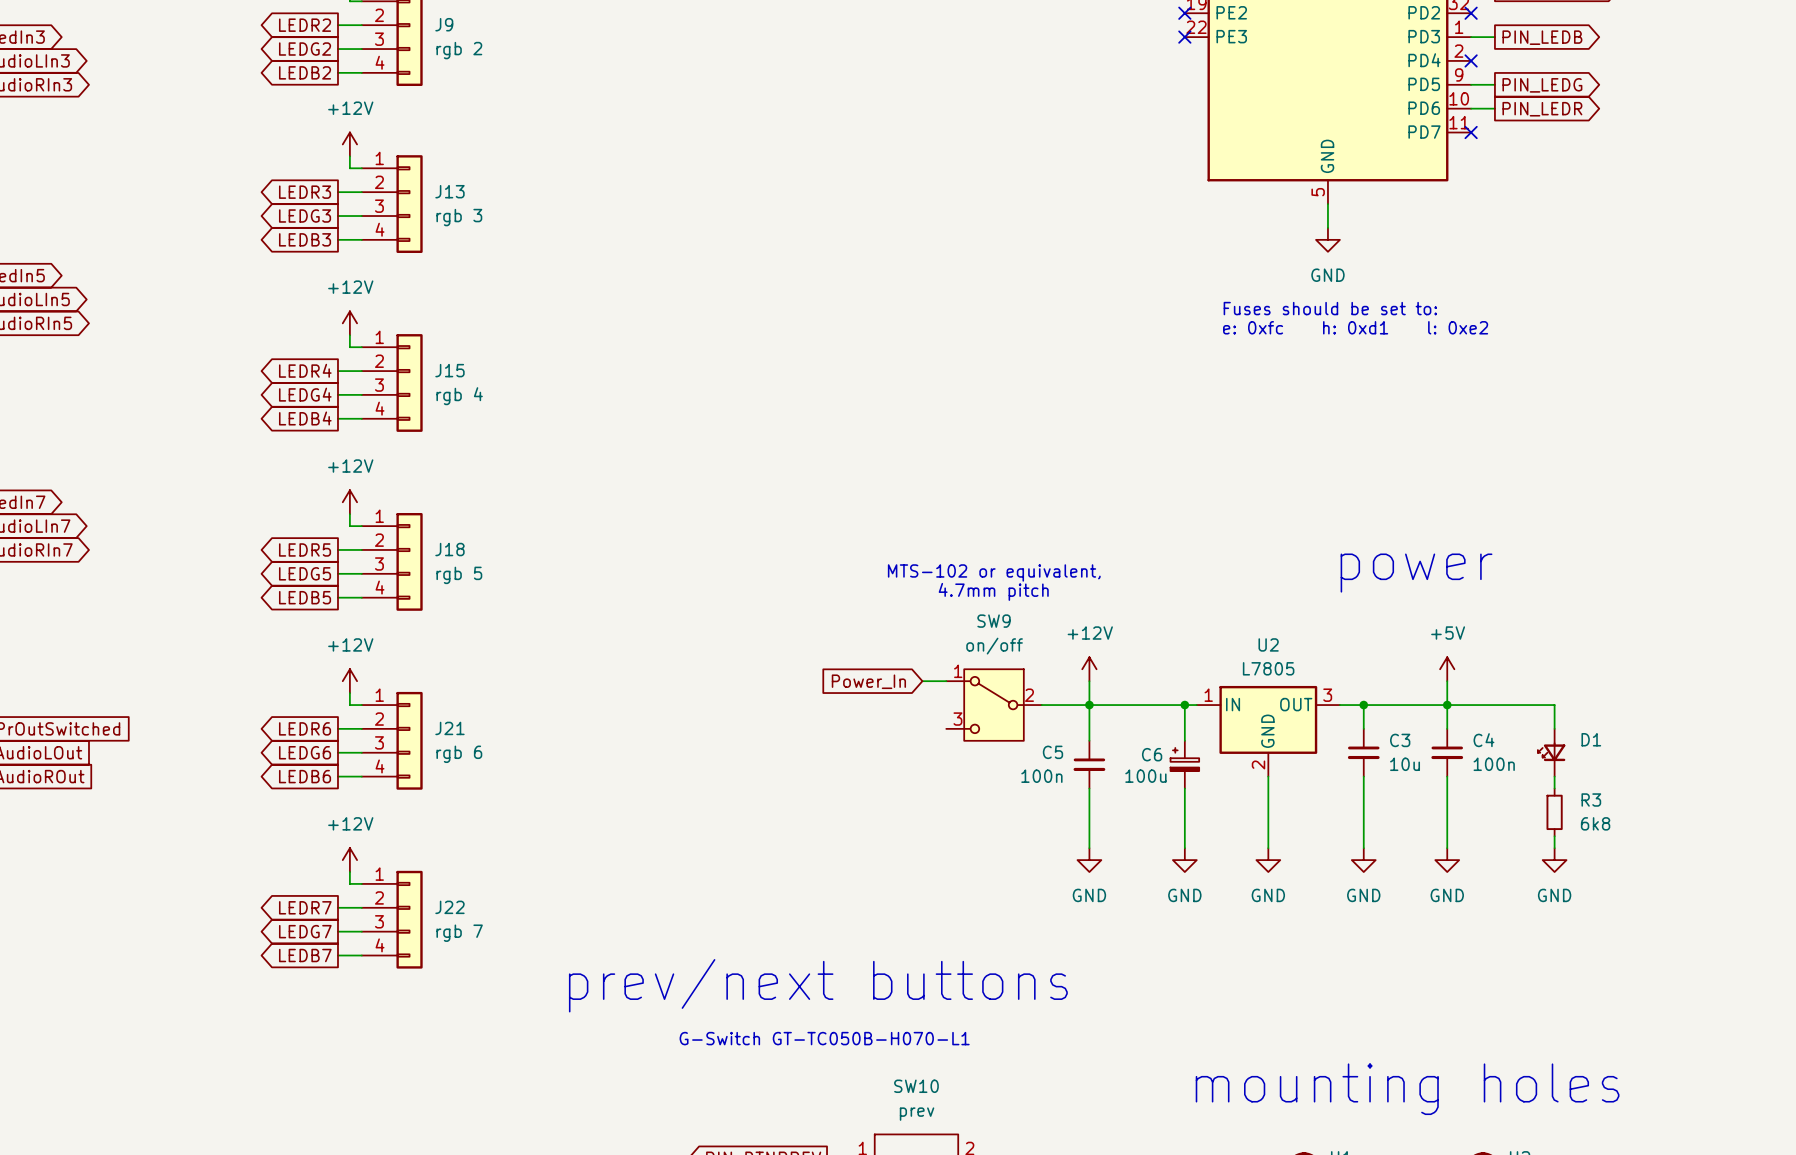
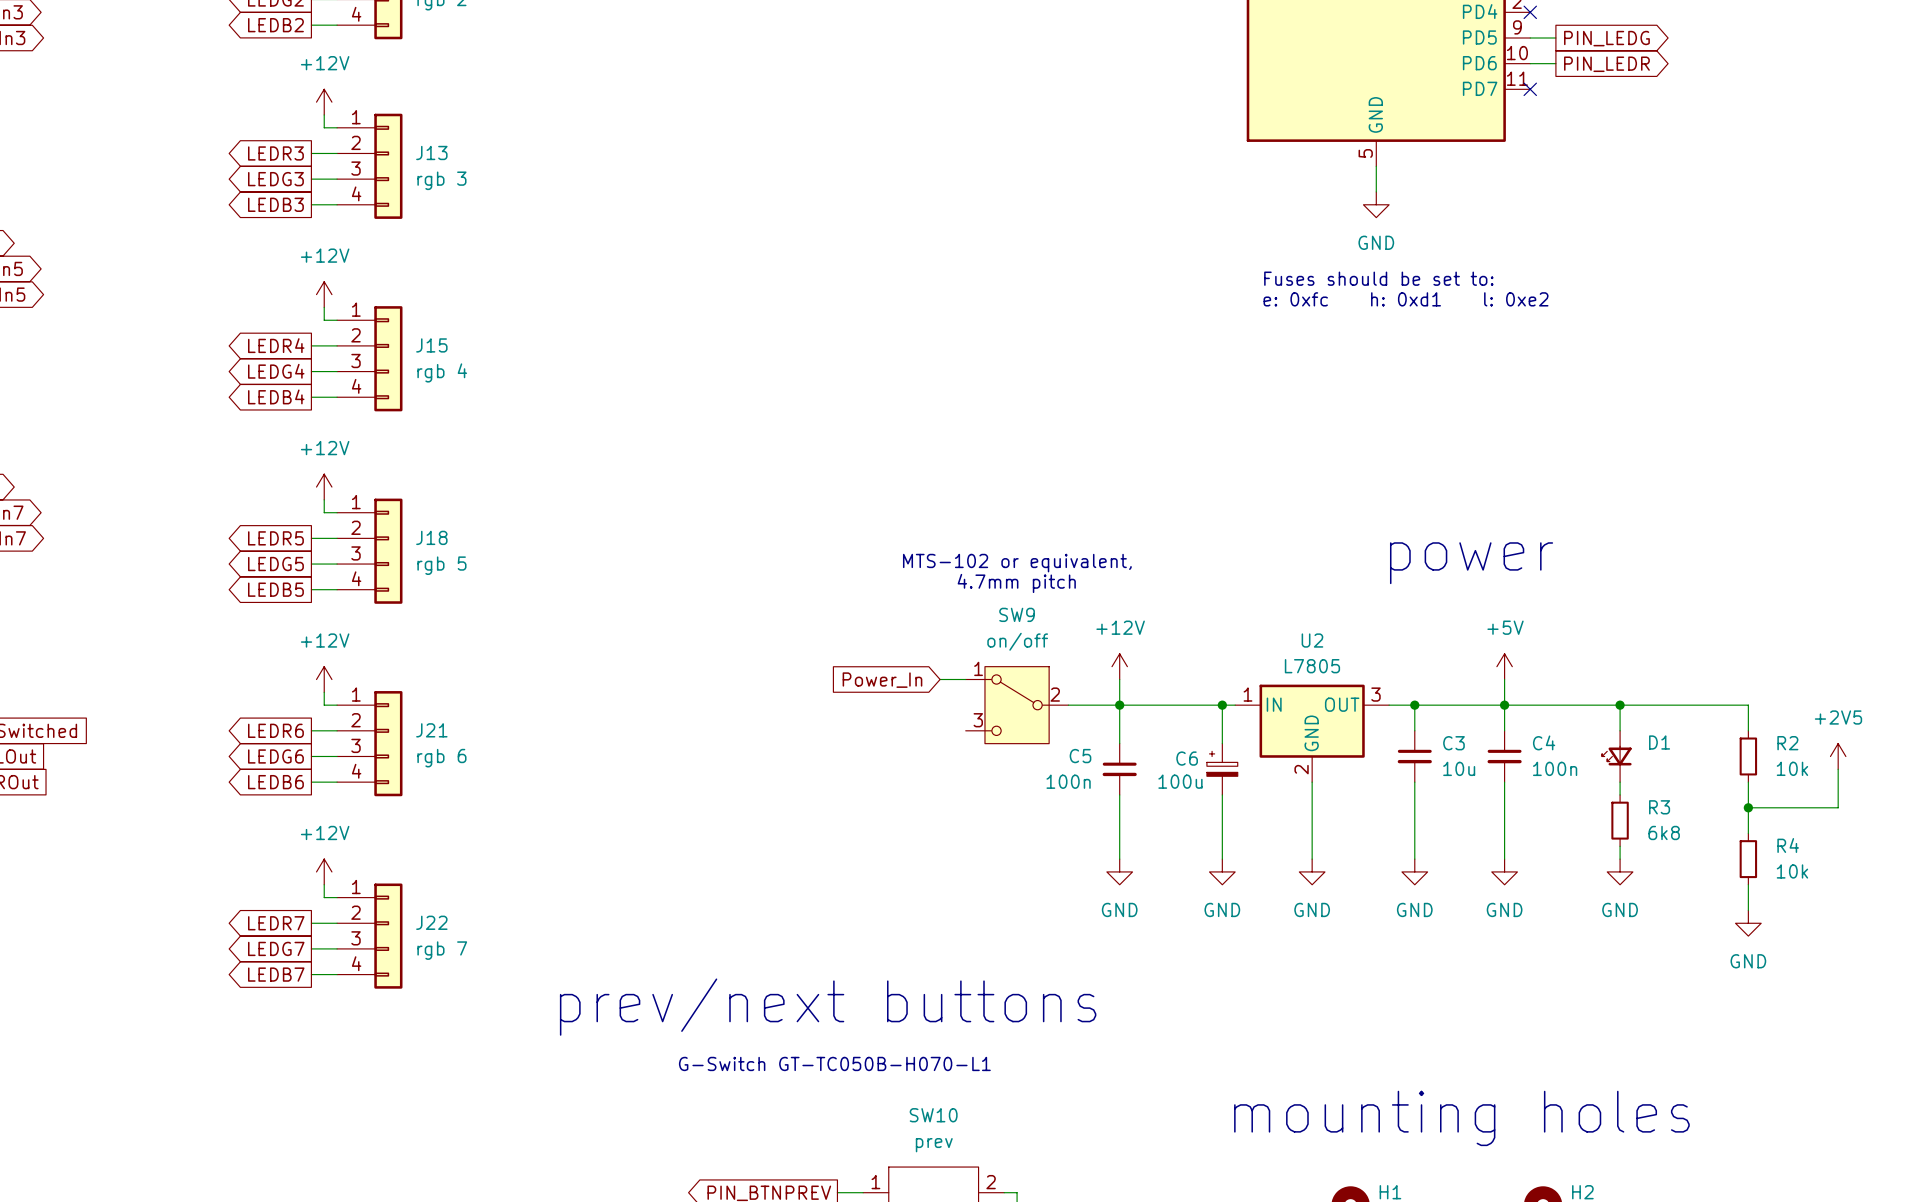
wire: none -> (1620, 705) (1748, 705) (1748, 730)
junction: none -> (1620, 705)
R2: none -> 10k (1748, 756)
power symbol: none -> +2V5 (1838, 756)
wire: none -> (1838, 769) (1838, 807) (1748, 807)
wire: none -> (1748, 782) (1748, 833)
junction: none -> (1748, 807)
R4: none -> 10k (1748, 859)
wire: none -> (1748, 884) (1748, 910)
power symbol: none -> GND (1748, 923)

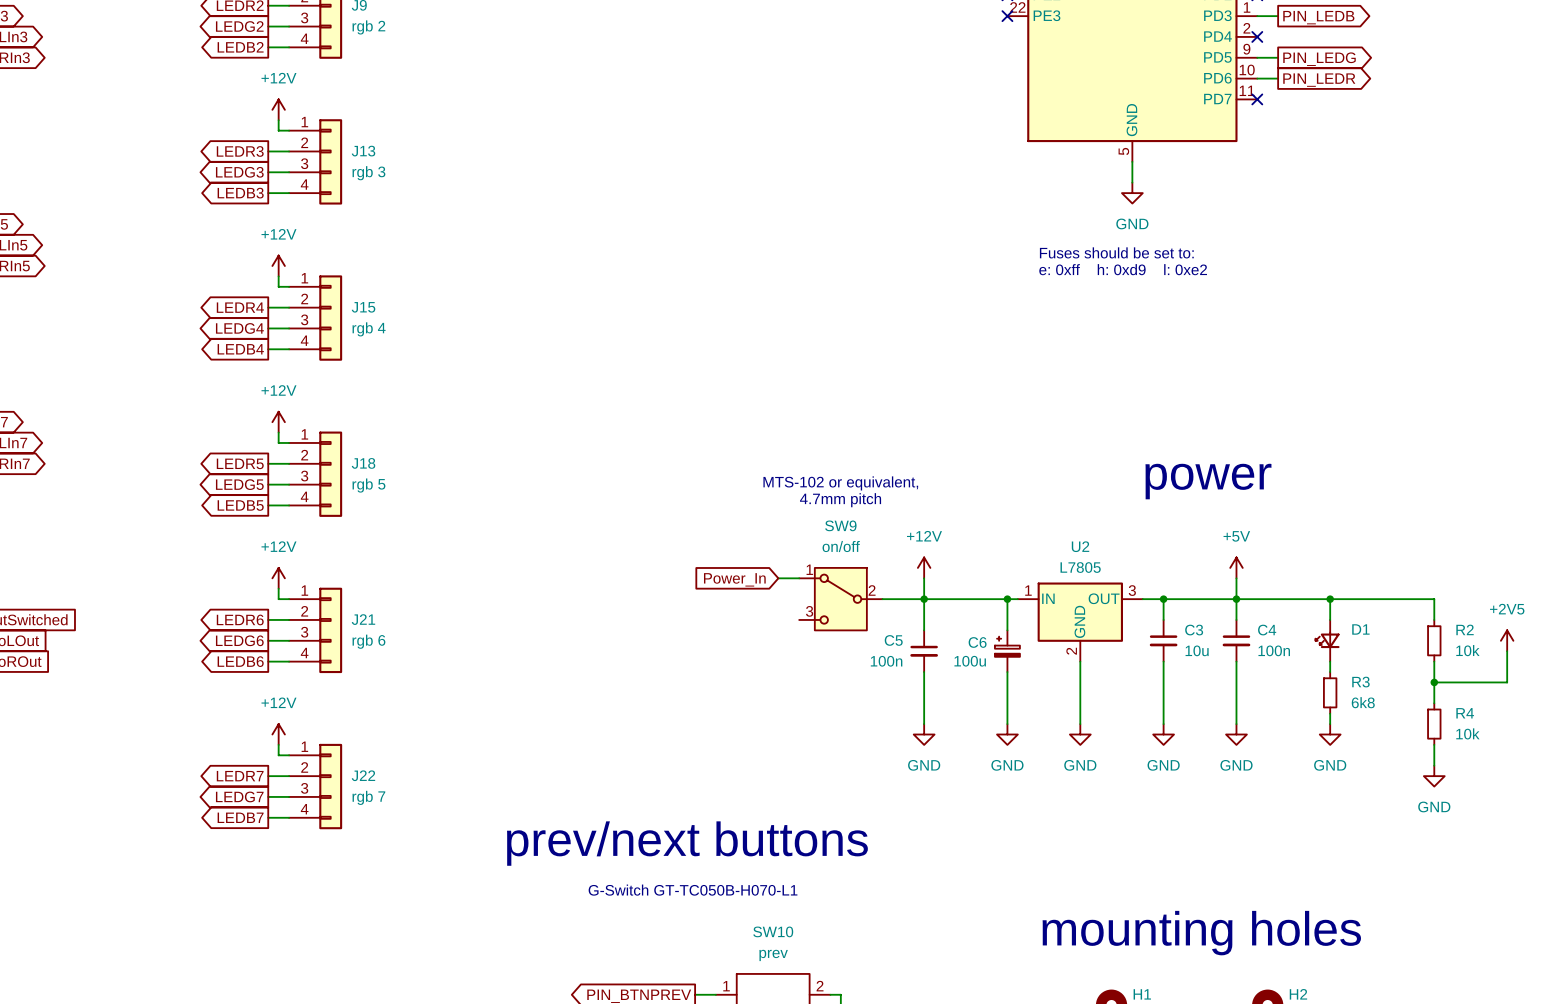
text: e: 0xfc h: 0xd1 l: 0xe2 (1406, 299) -> e: 0xff h: 0xd9 l: 0xe2 (1123, 269)

